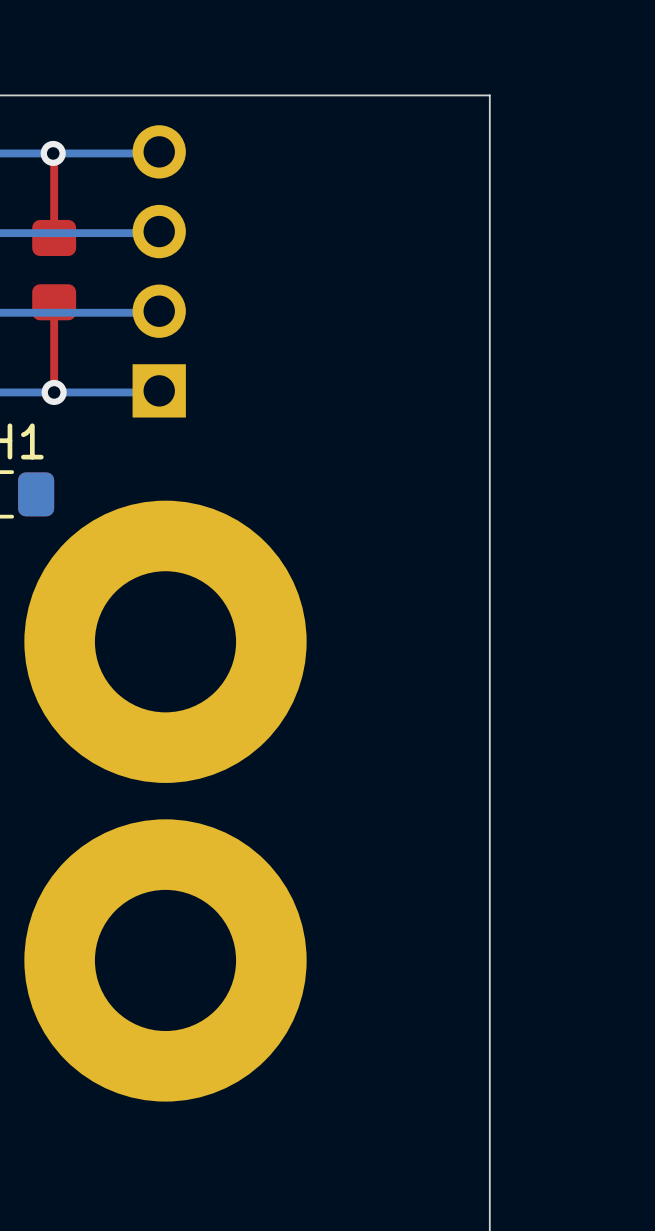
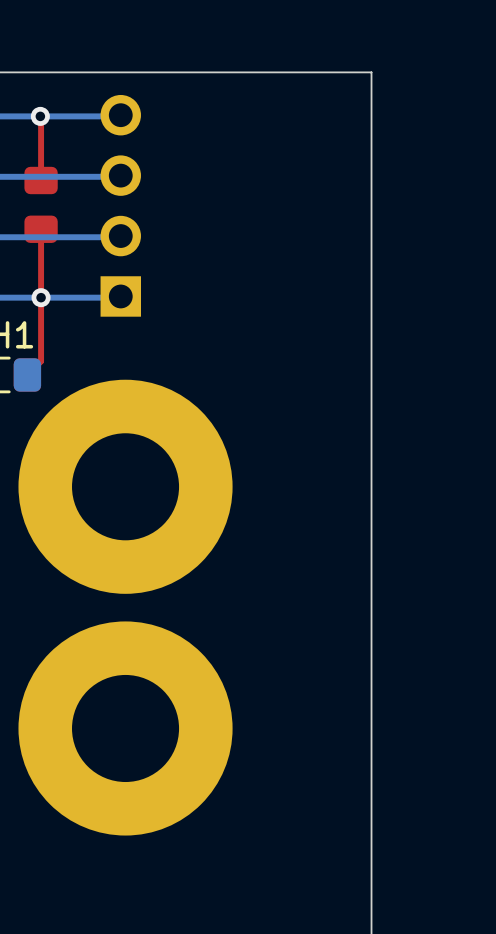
top track: none -> (41, 297) (41, 361) (27, 374)

